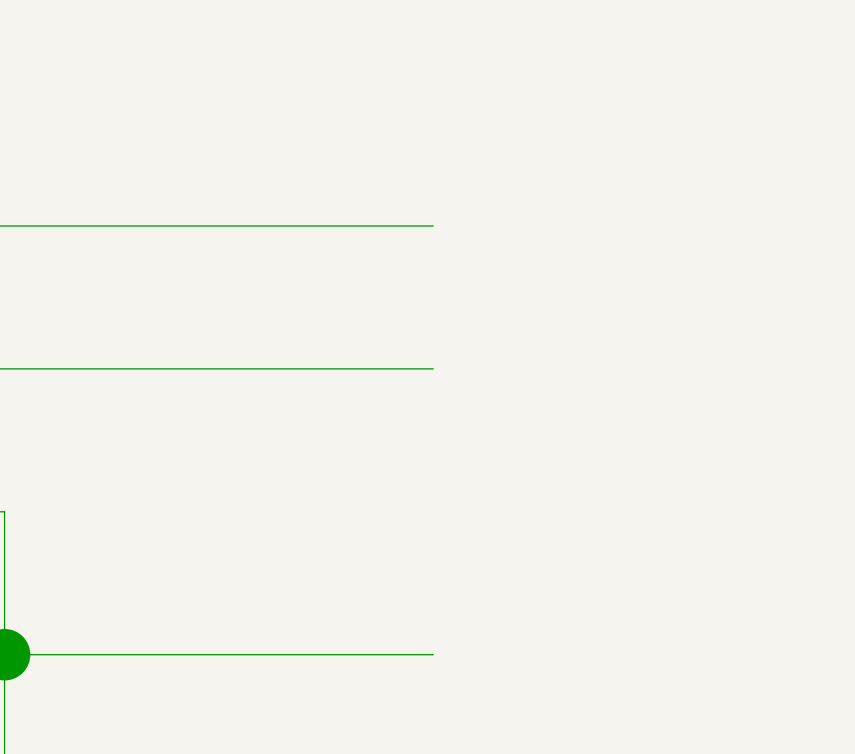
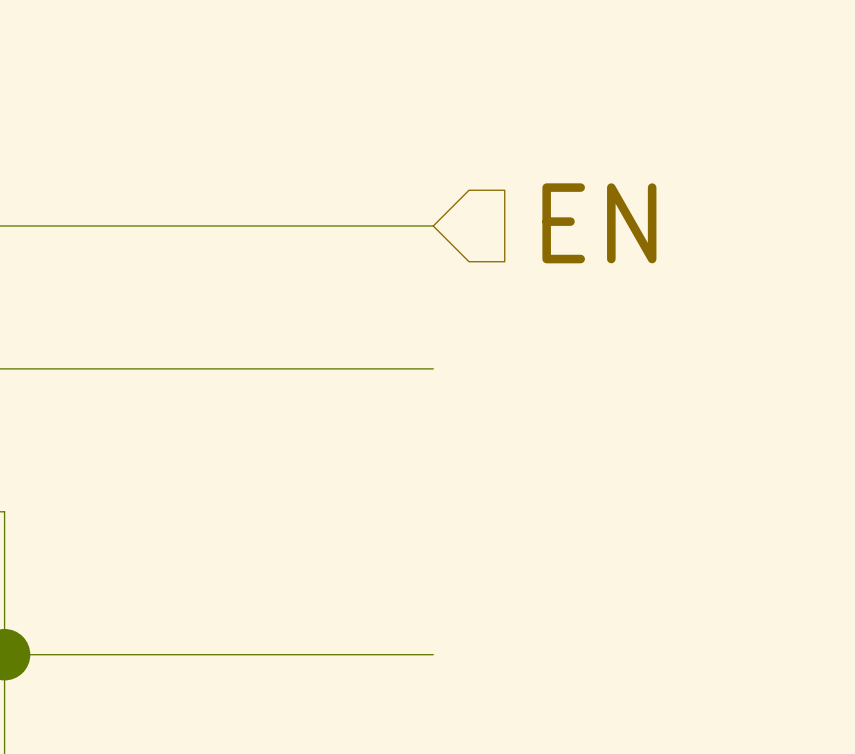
hierarchical label: none -> EN (599, 223)

